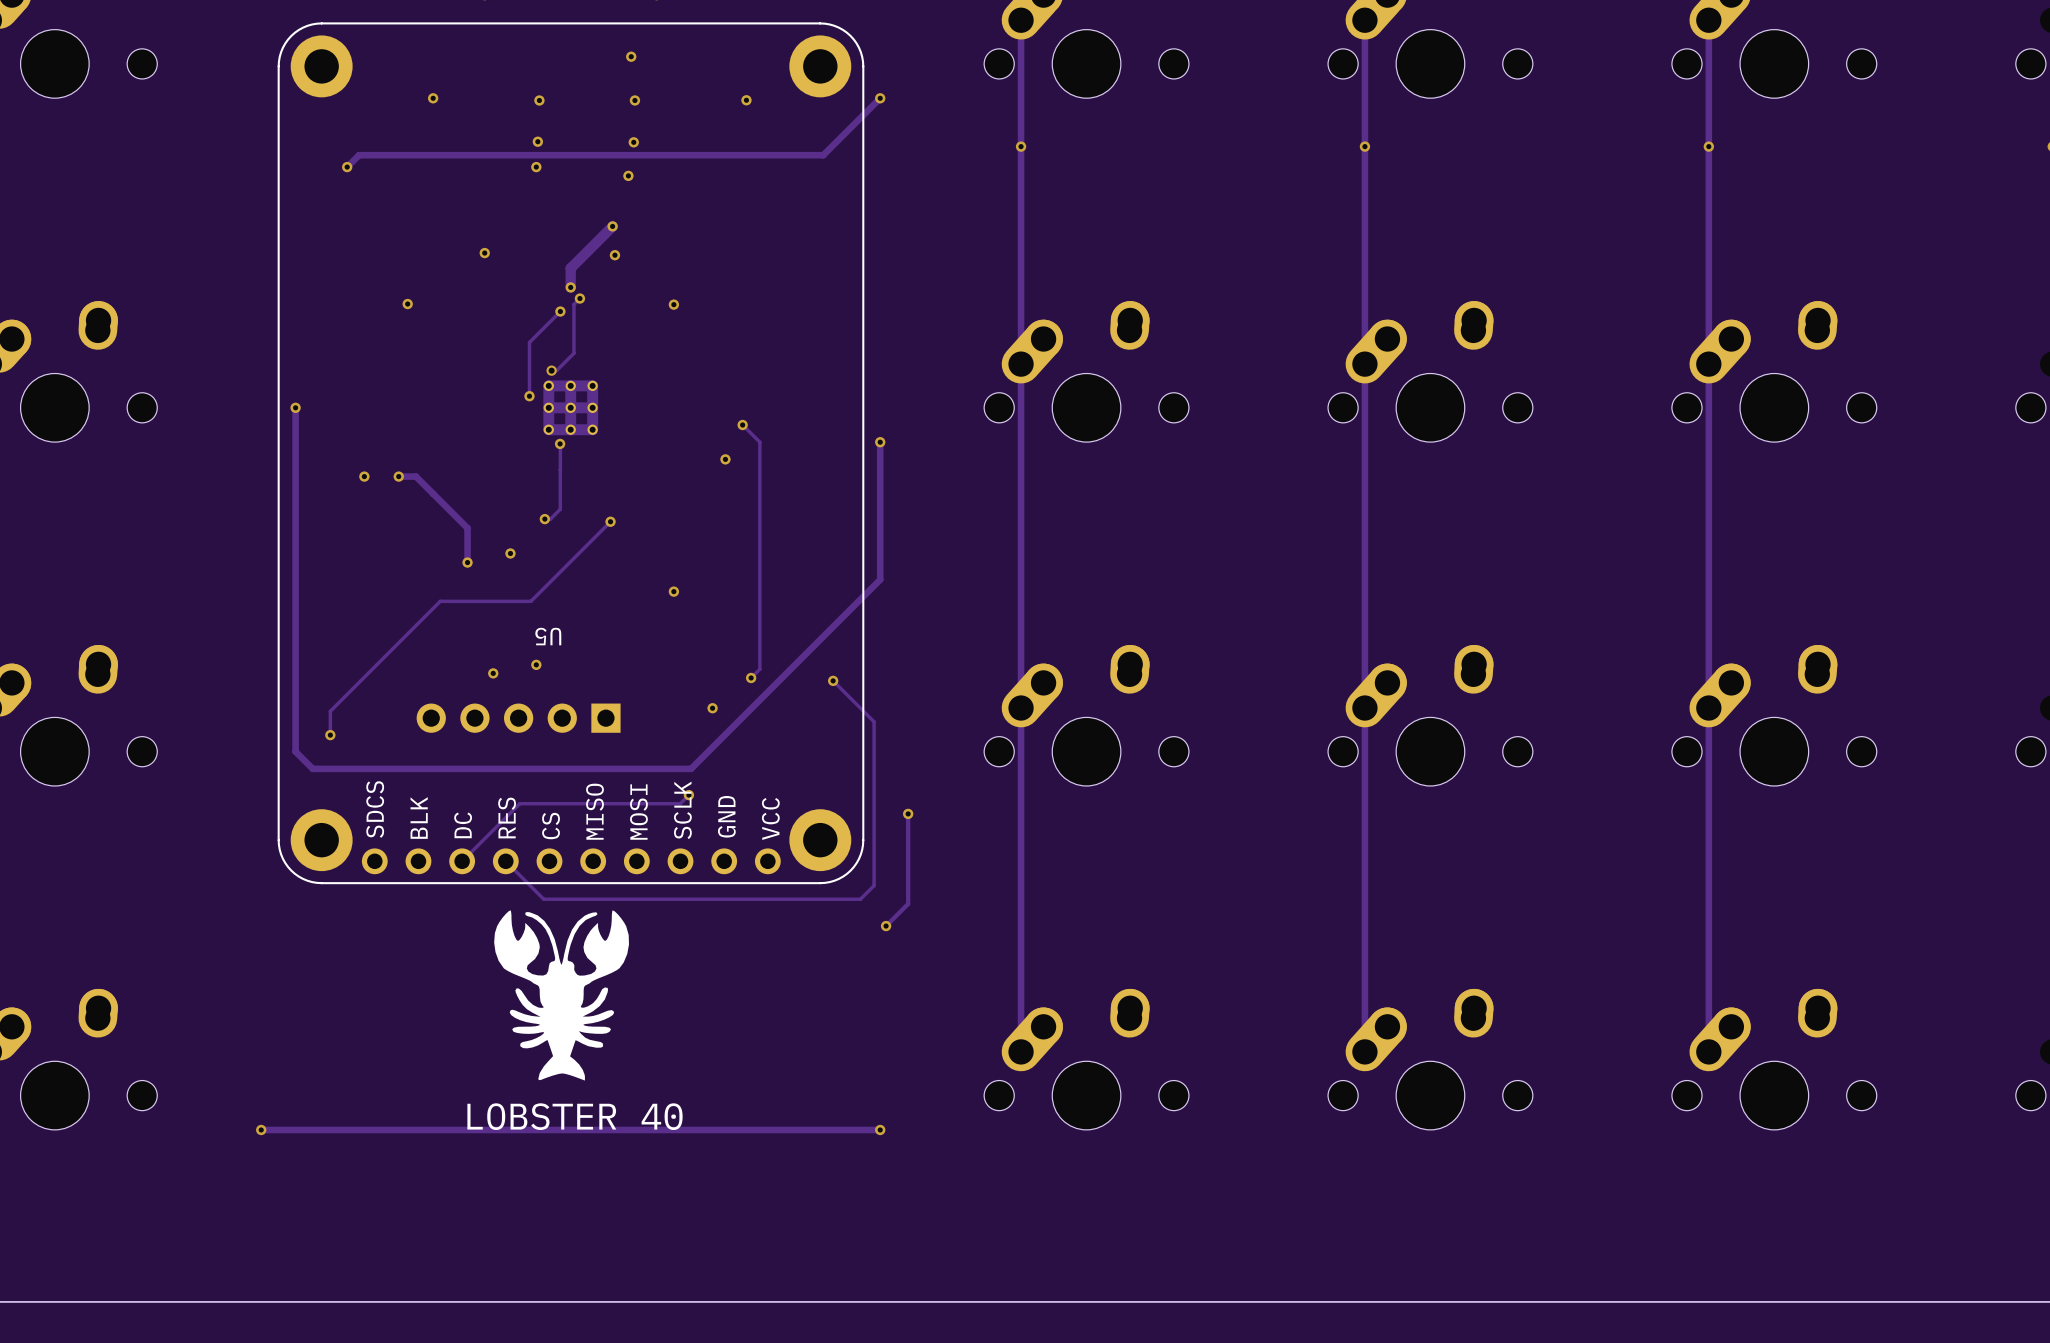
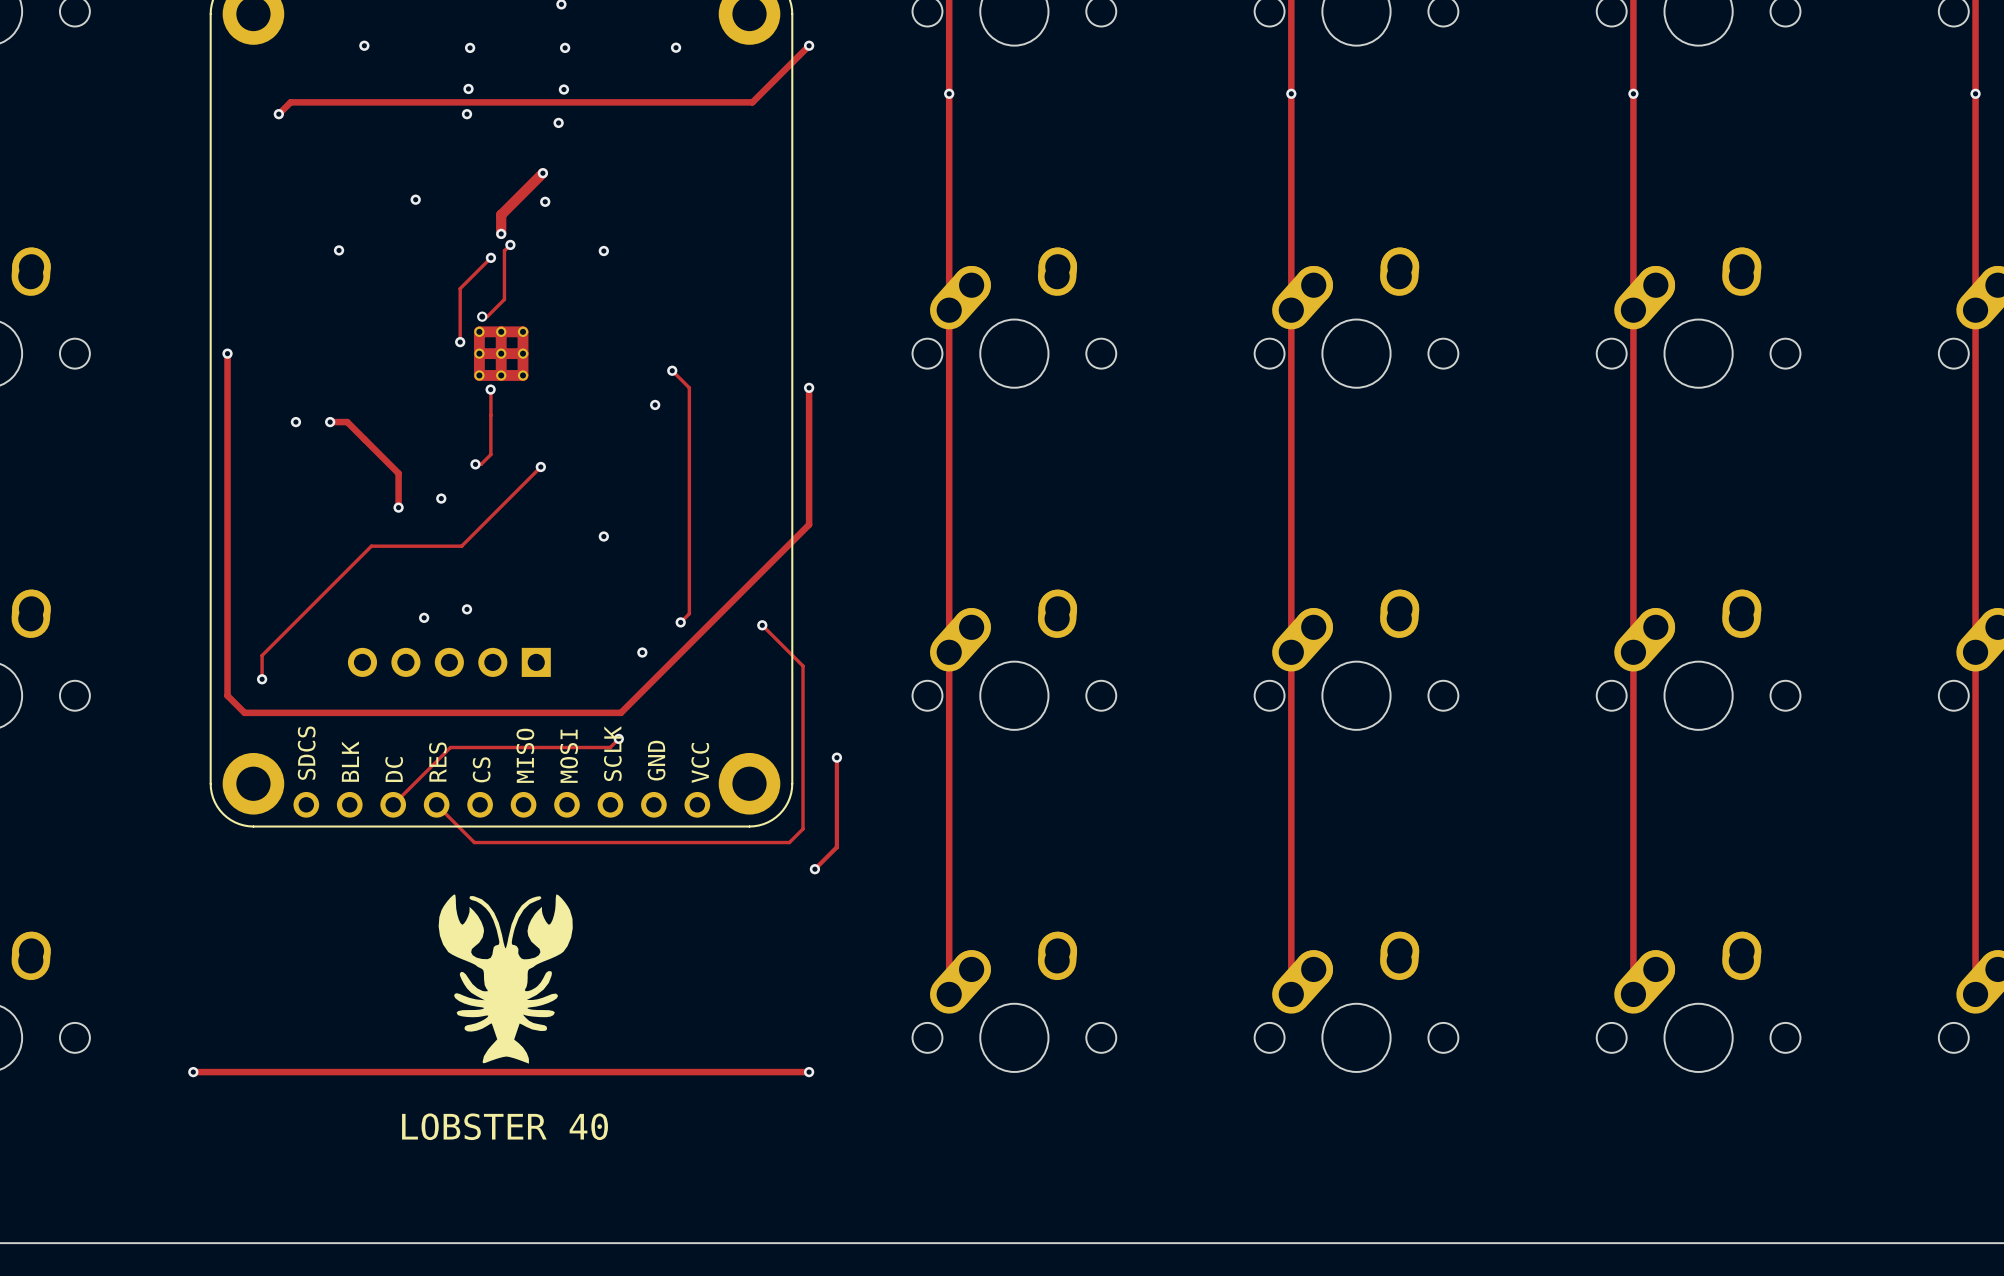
U5 name: U5 (548, 636) -> none
drawing position: (561, 995) -> (505, 978)
text position: LOBSTER 40 (575, 1116) -> LOBSTER 40 (505, 1126)

